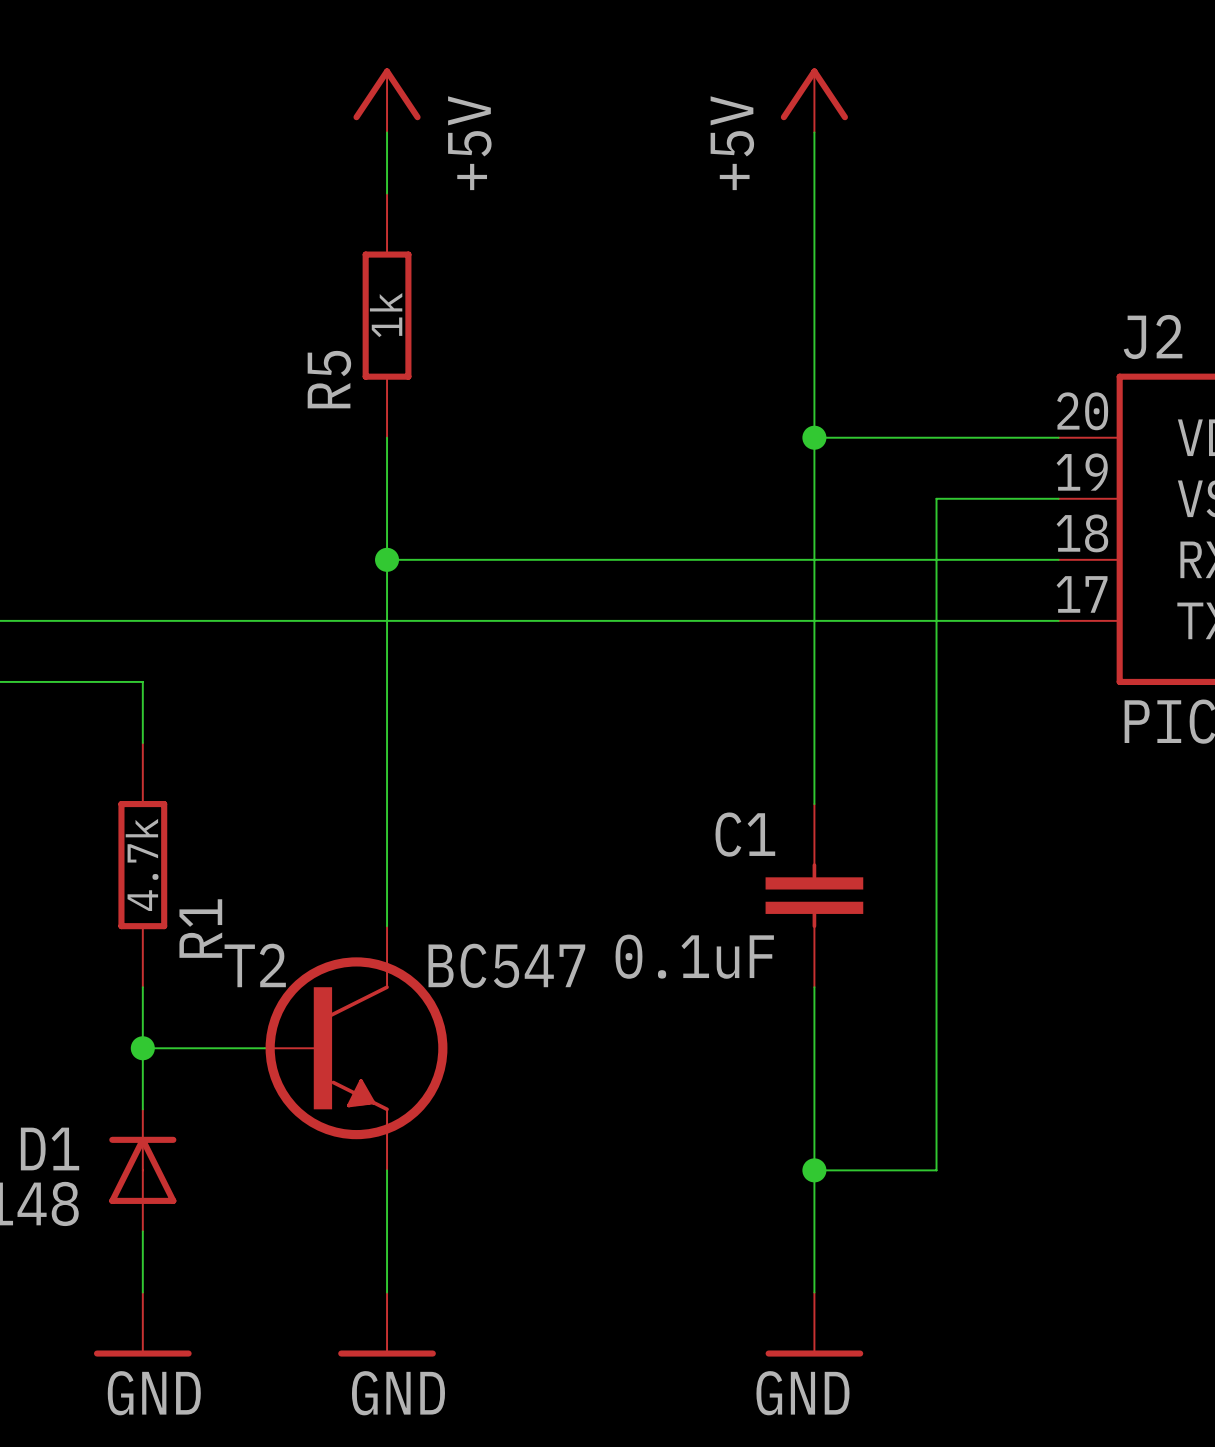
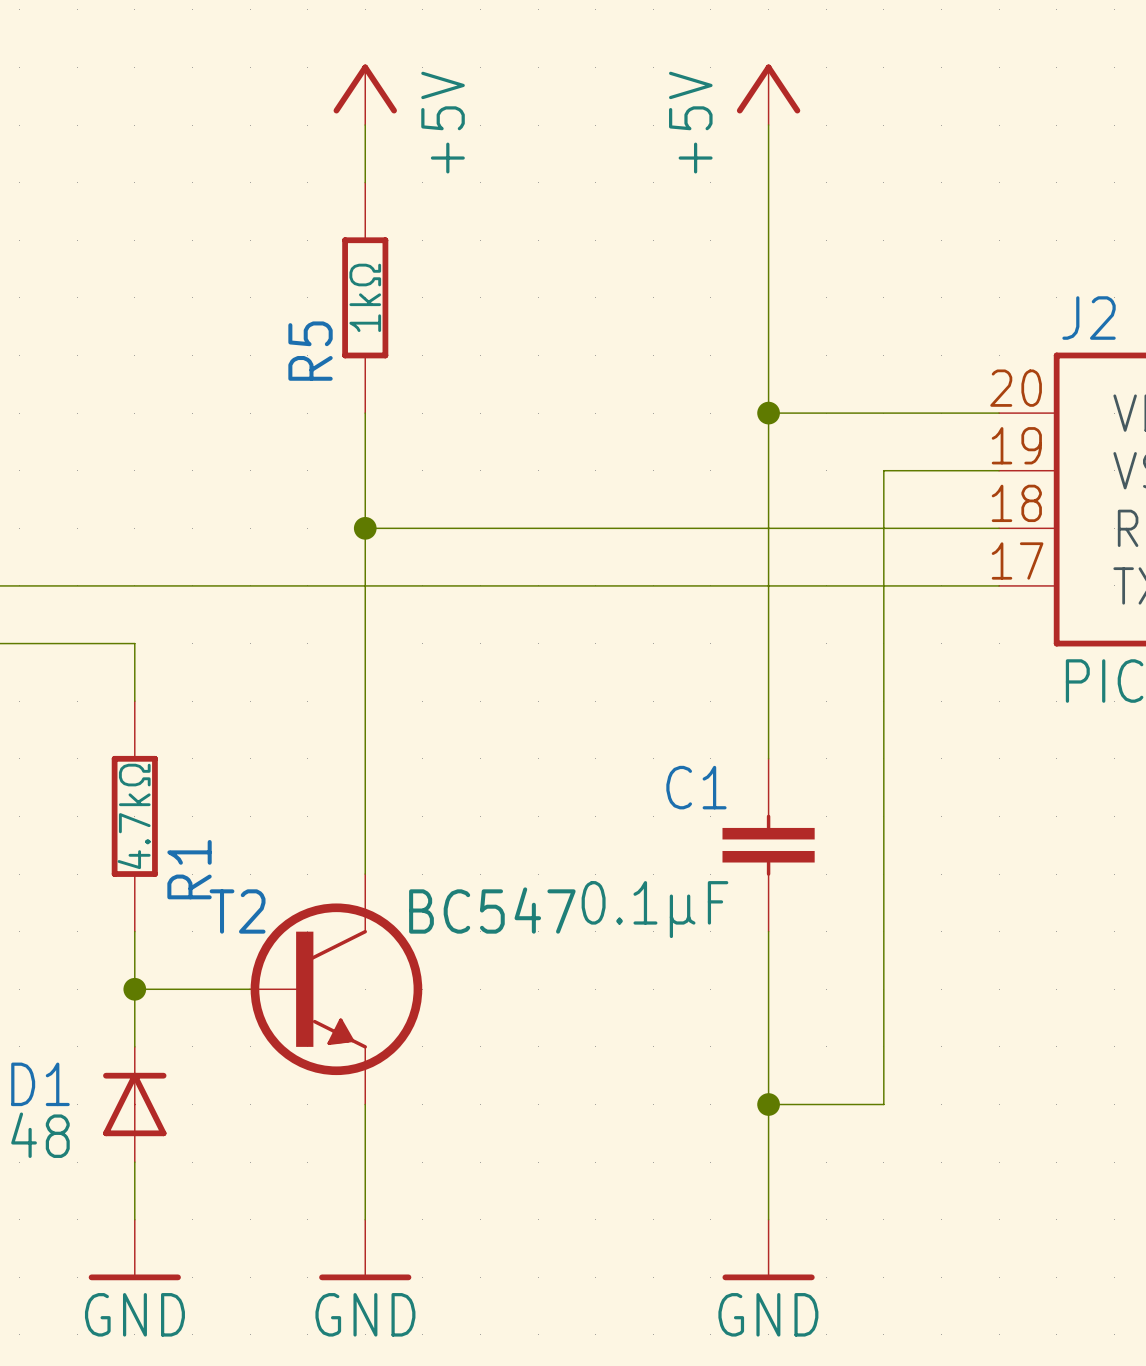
R5 value: 1k (386, 315) -> 1kΩ (365, 297)
R1 value: 4.7k (142, 864) -> 4.7kΩ (134, 816)
C1 value: 0.1uF (694, 956) -> 0.1μF (654, 909)

